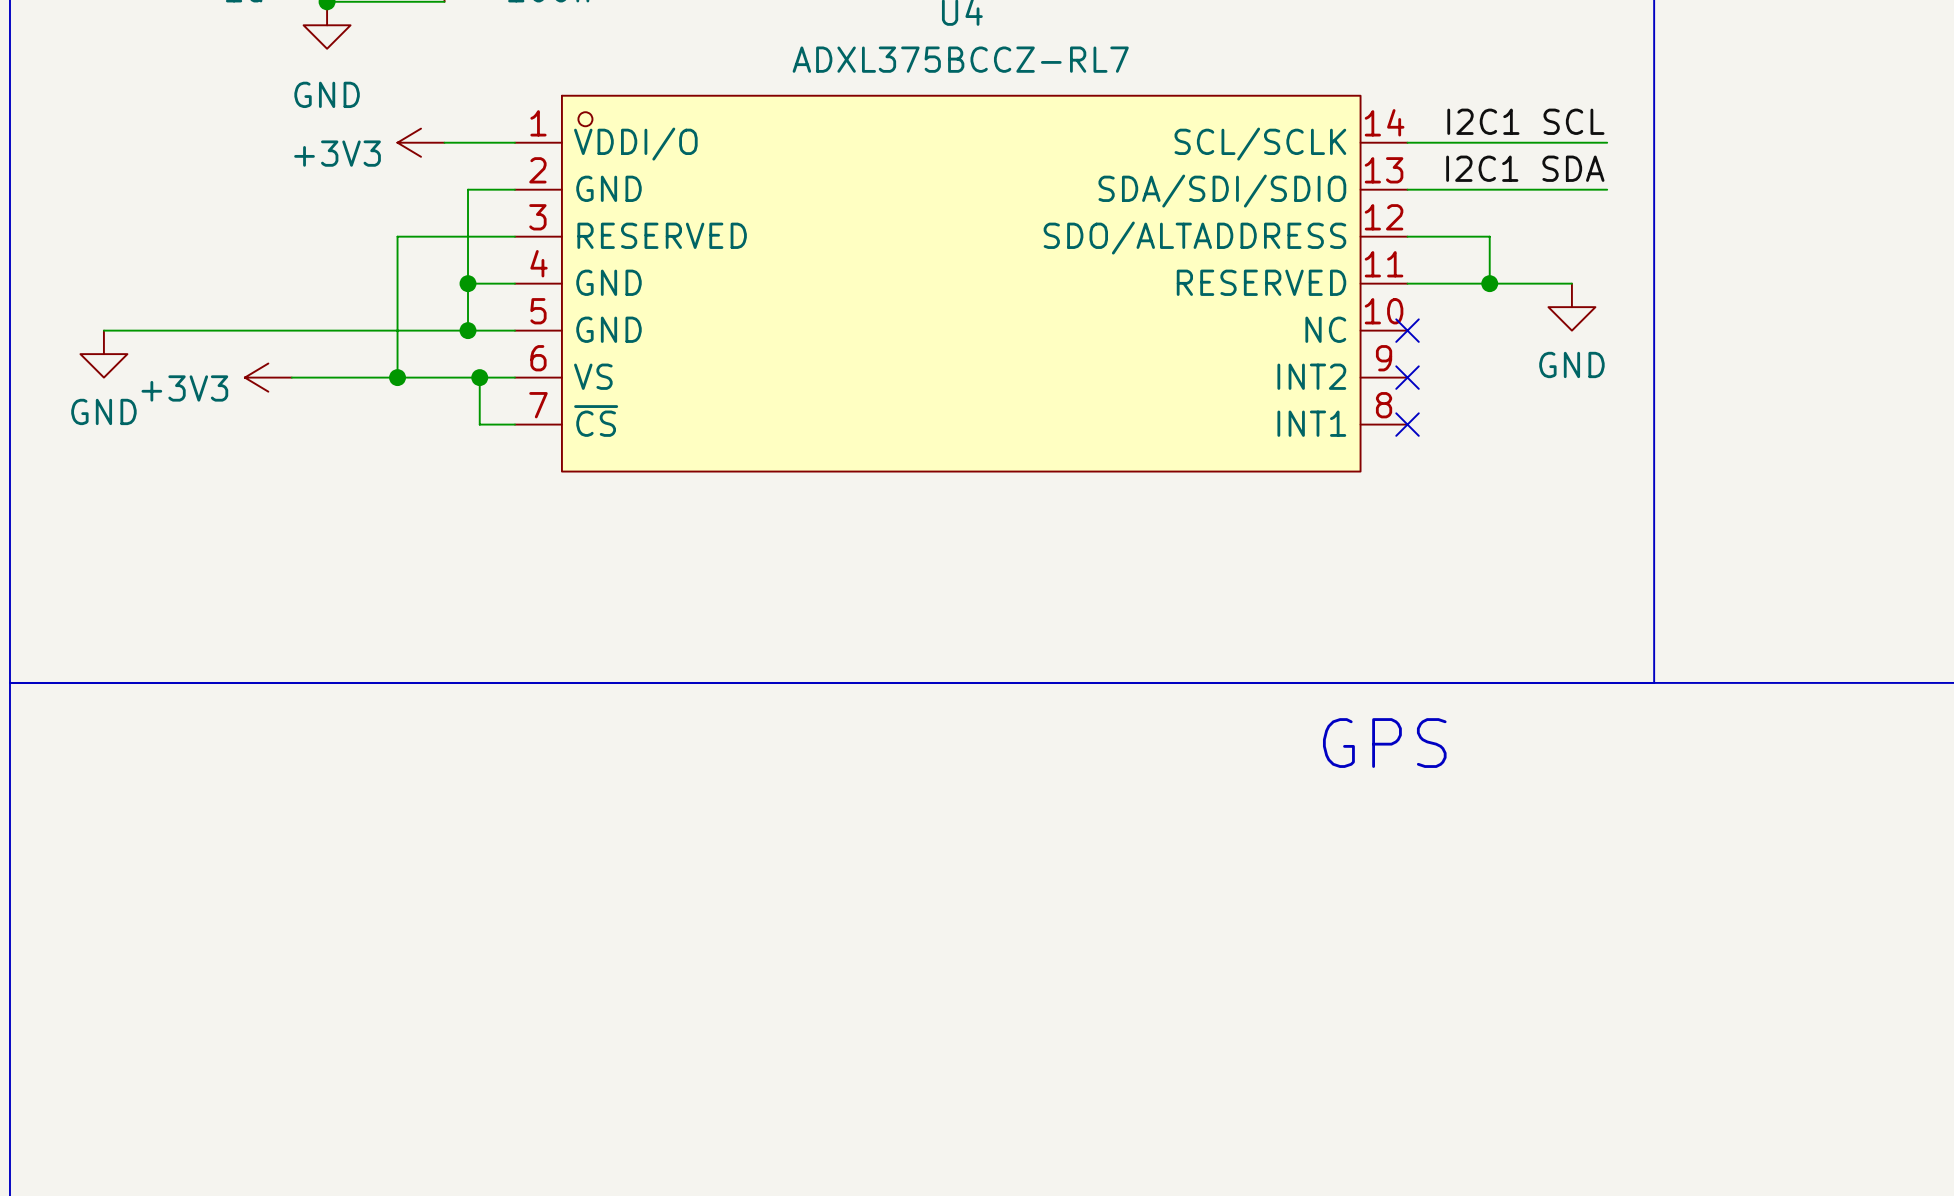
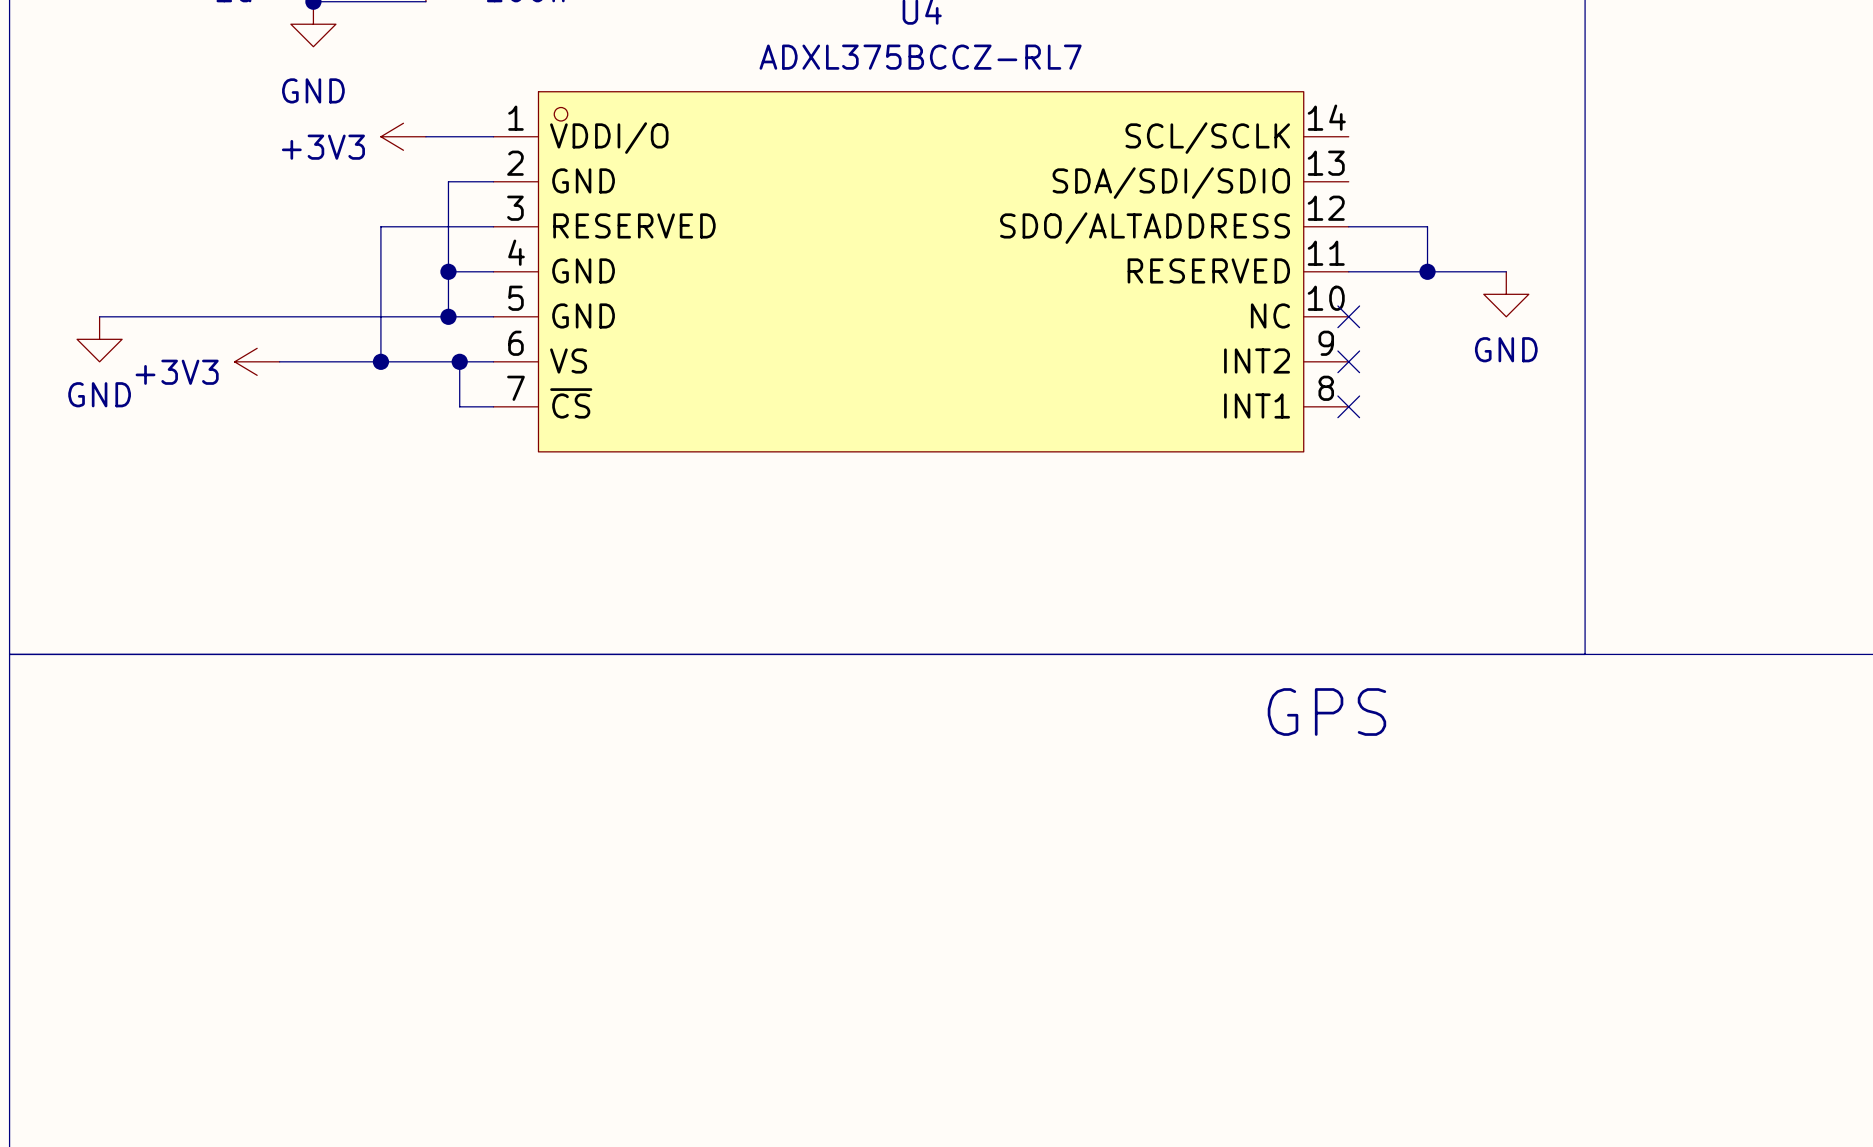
label: I2C1 SCL (1525, 121) -> none
wire: (1407, 142) (1607, 142) -> none
label: I2C1 SDA (1525, 168) -> none
wire: (1407, 189) (1607, 189) -> none

